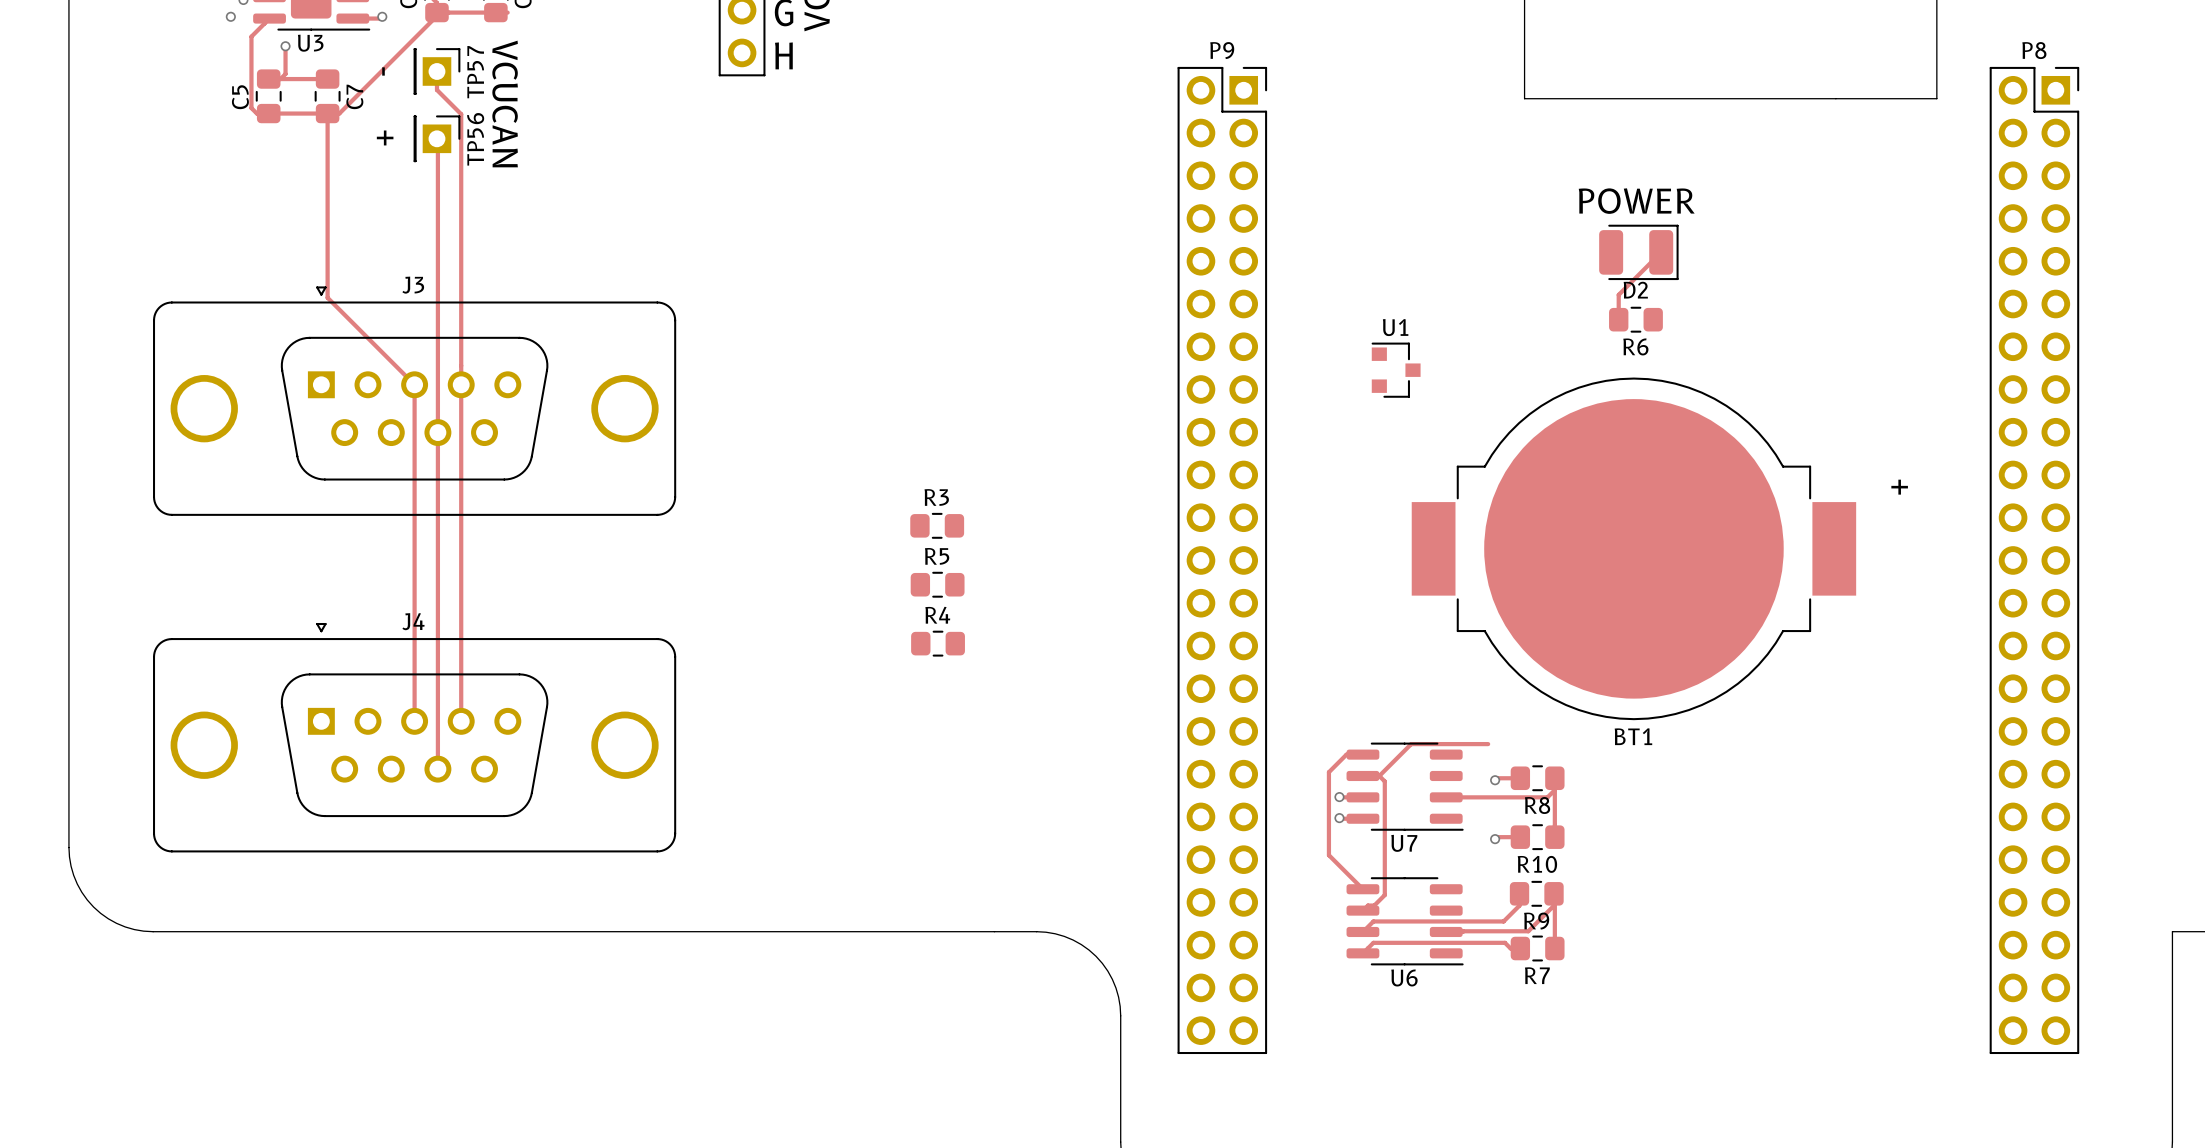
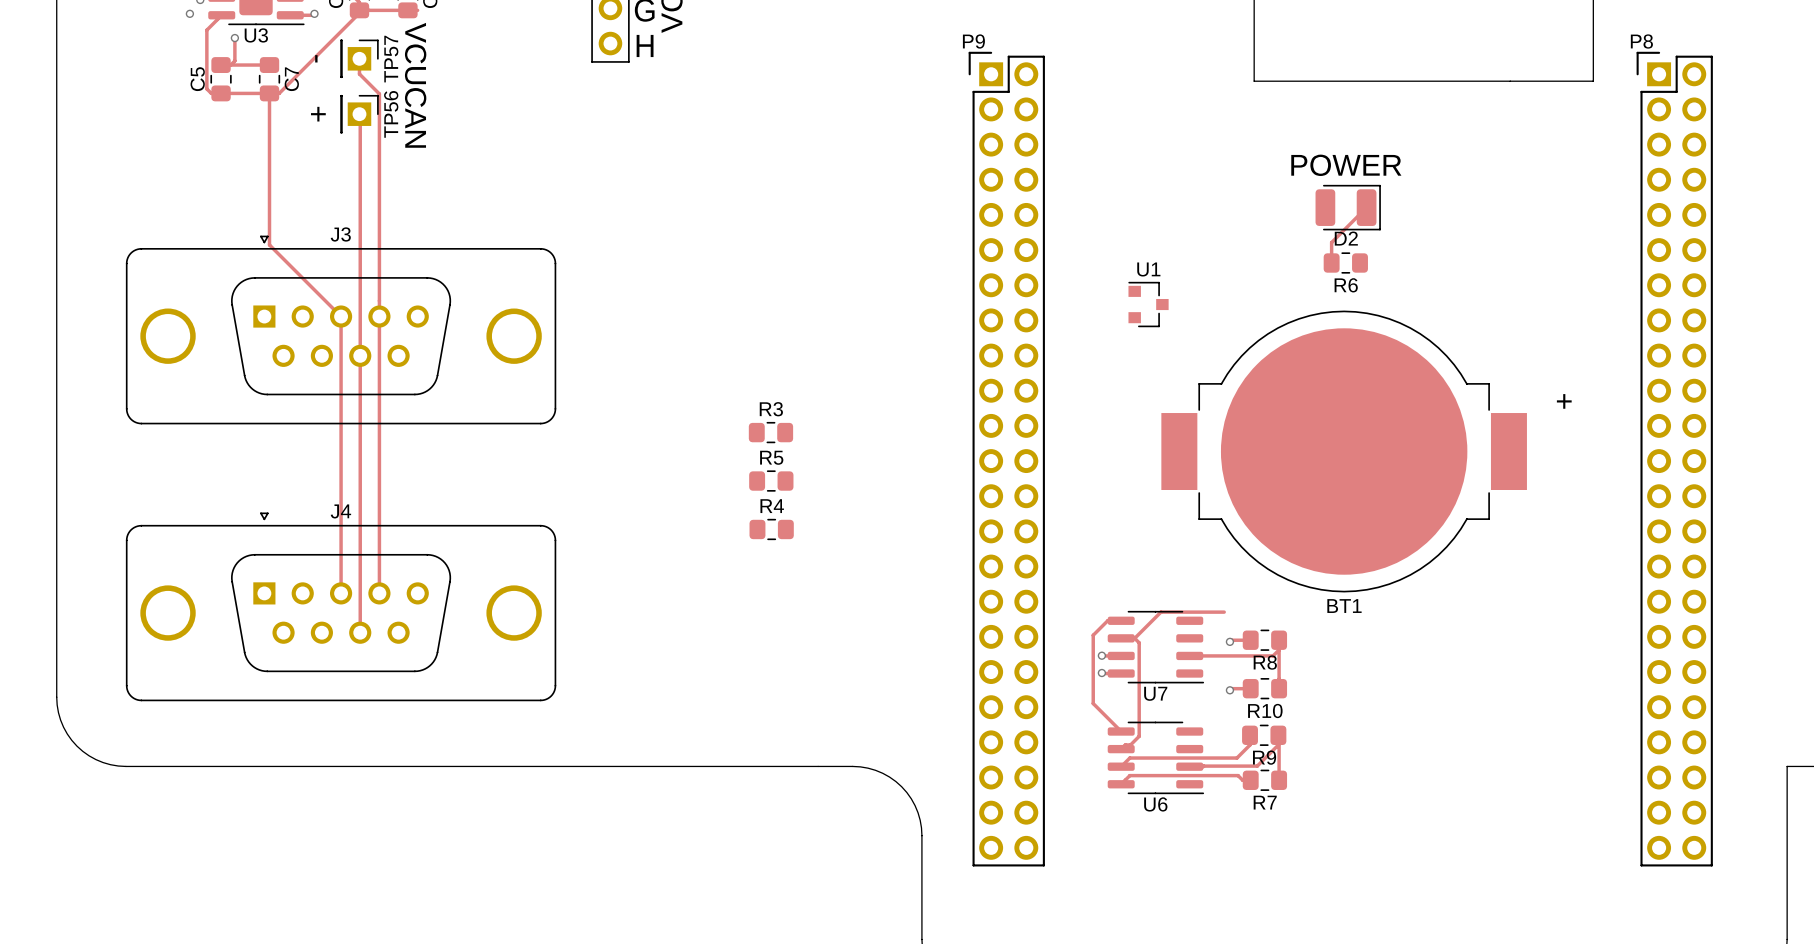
P9 name position: P9 (1222, 50) -> P9 (973, 41)
P8 name position: P8 (2034, 50) -> P8 (1641, 41)
P9 footprint: [1177, 66, 1268, 1055] -> [968, 51, 1045, 867]
P8 footprint: [1989, 66, 2080, 1055] -> [1636, 51, 1713, 867]

